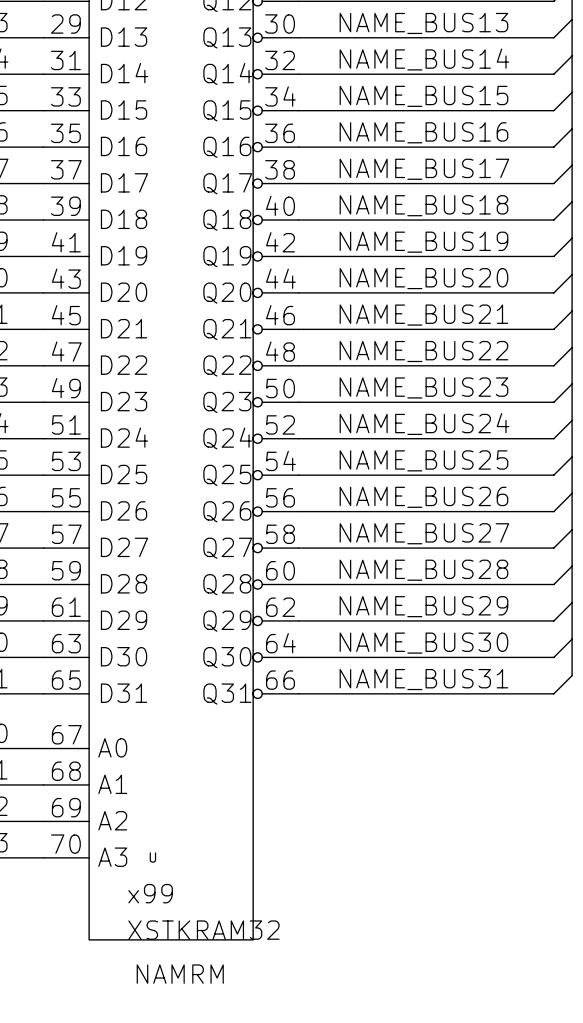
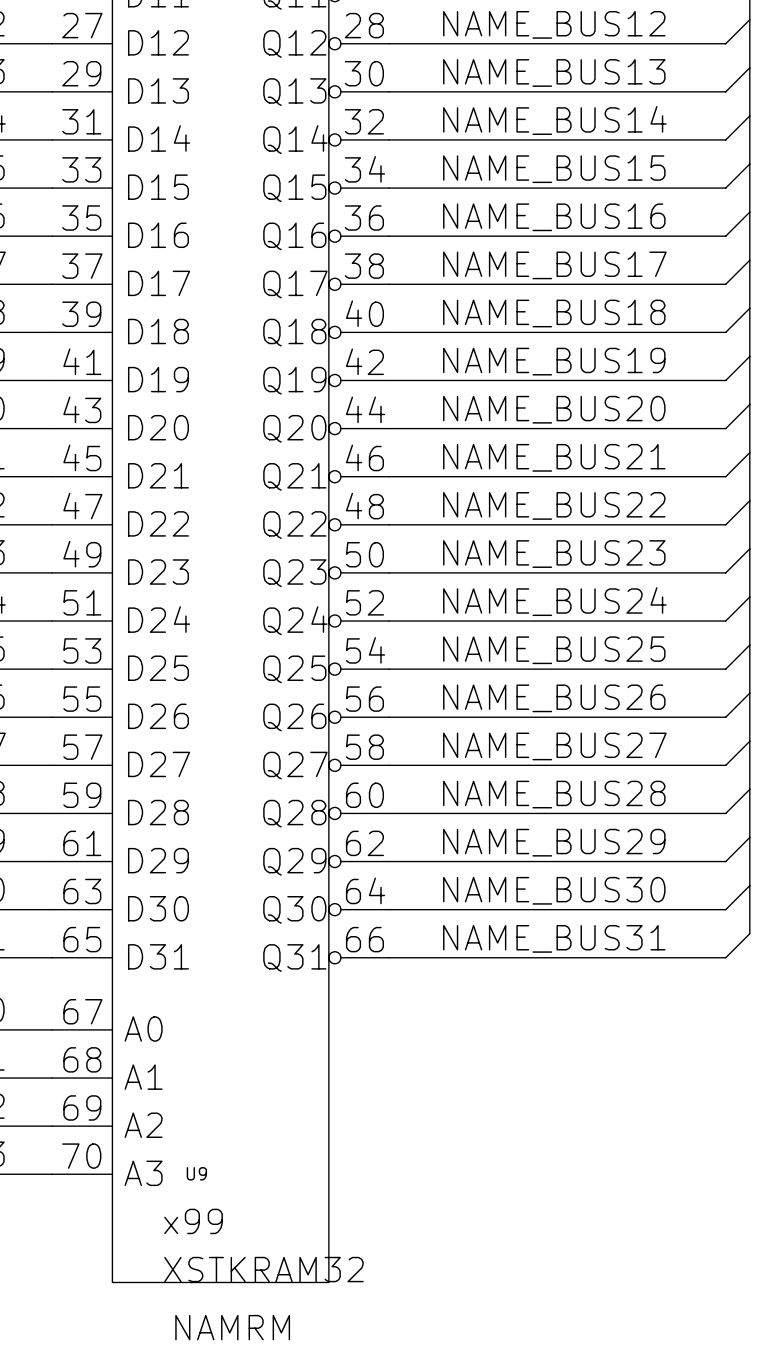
U name: U (152, 857) -> U9 (196, 1173)

